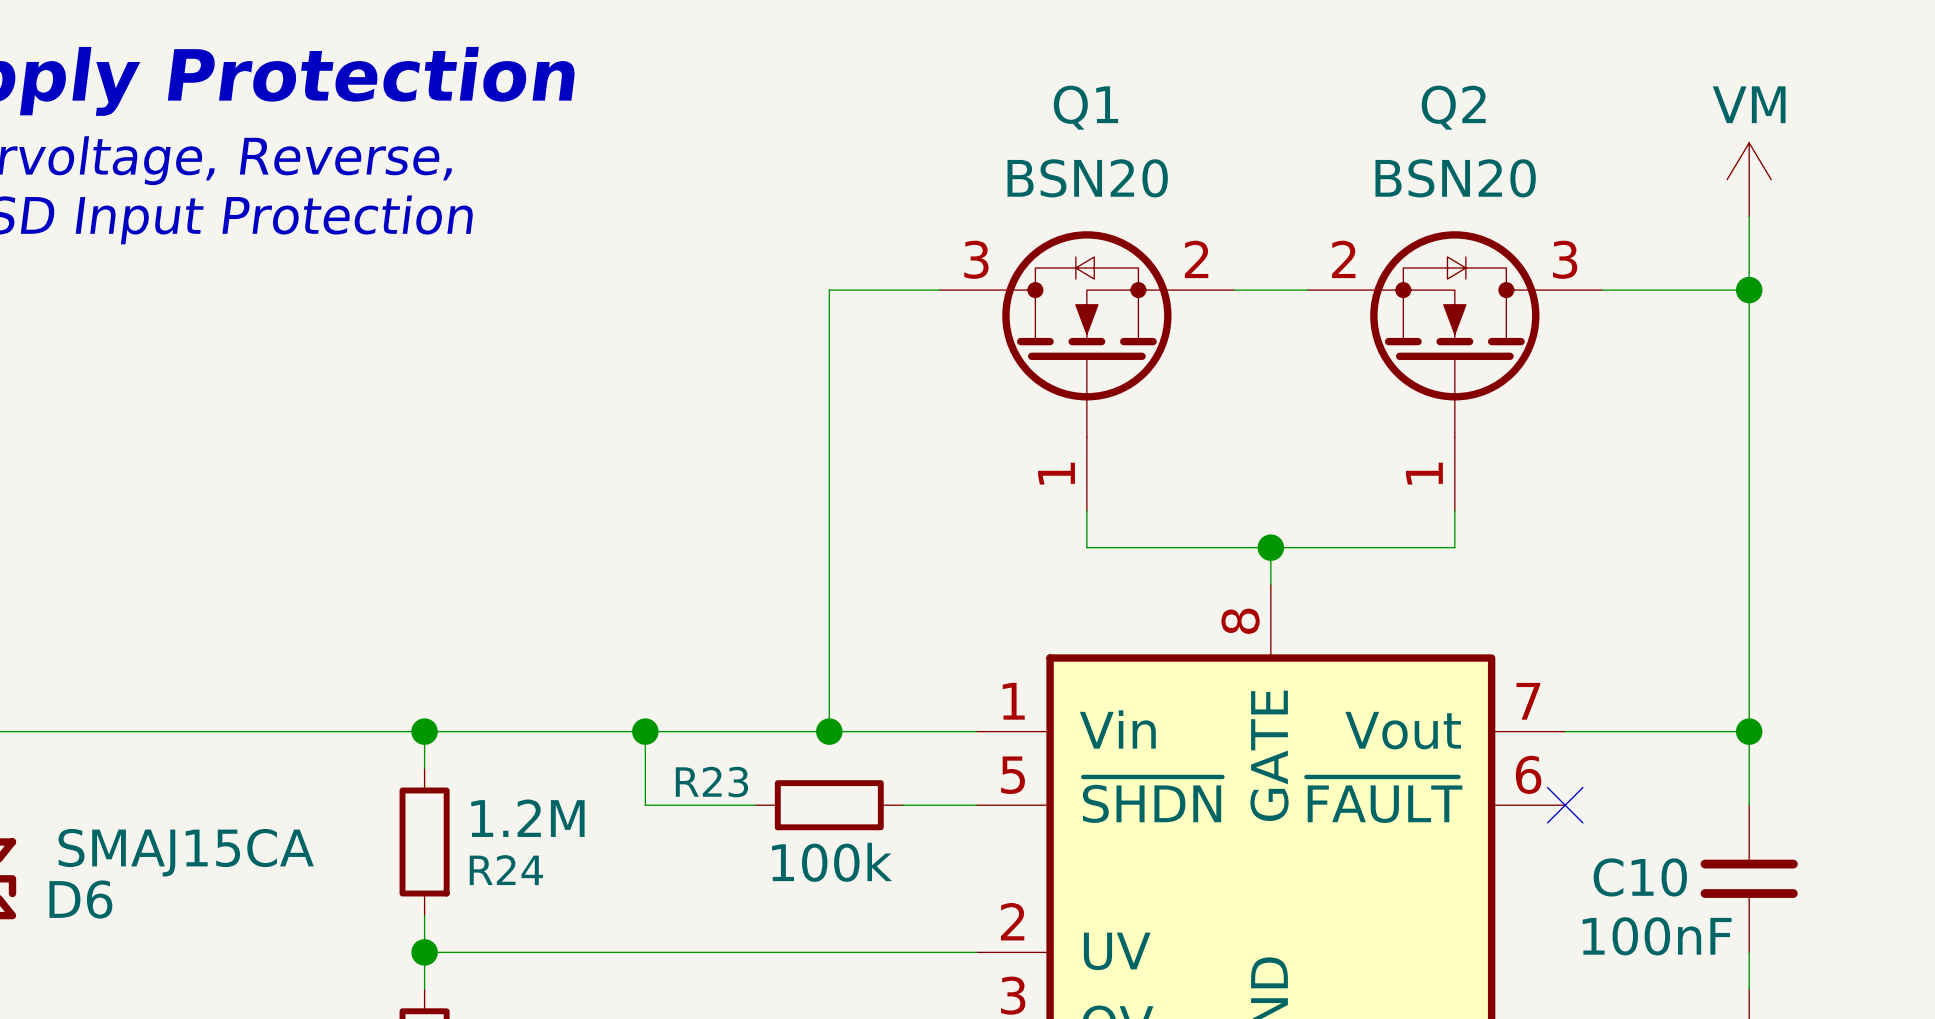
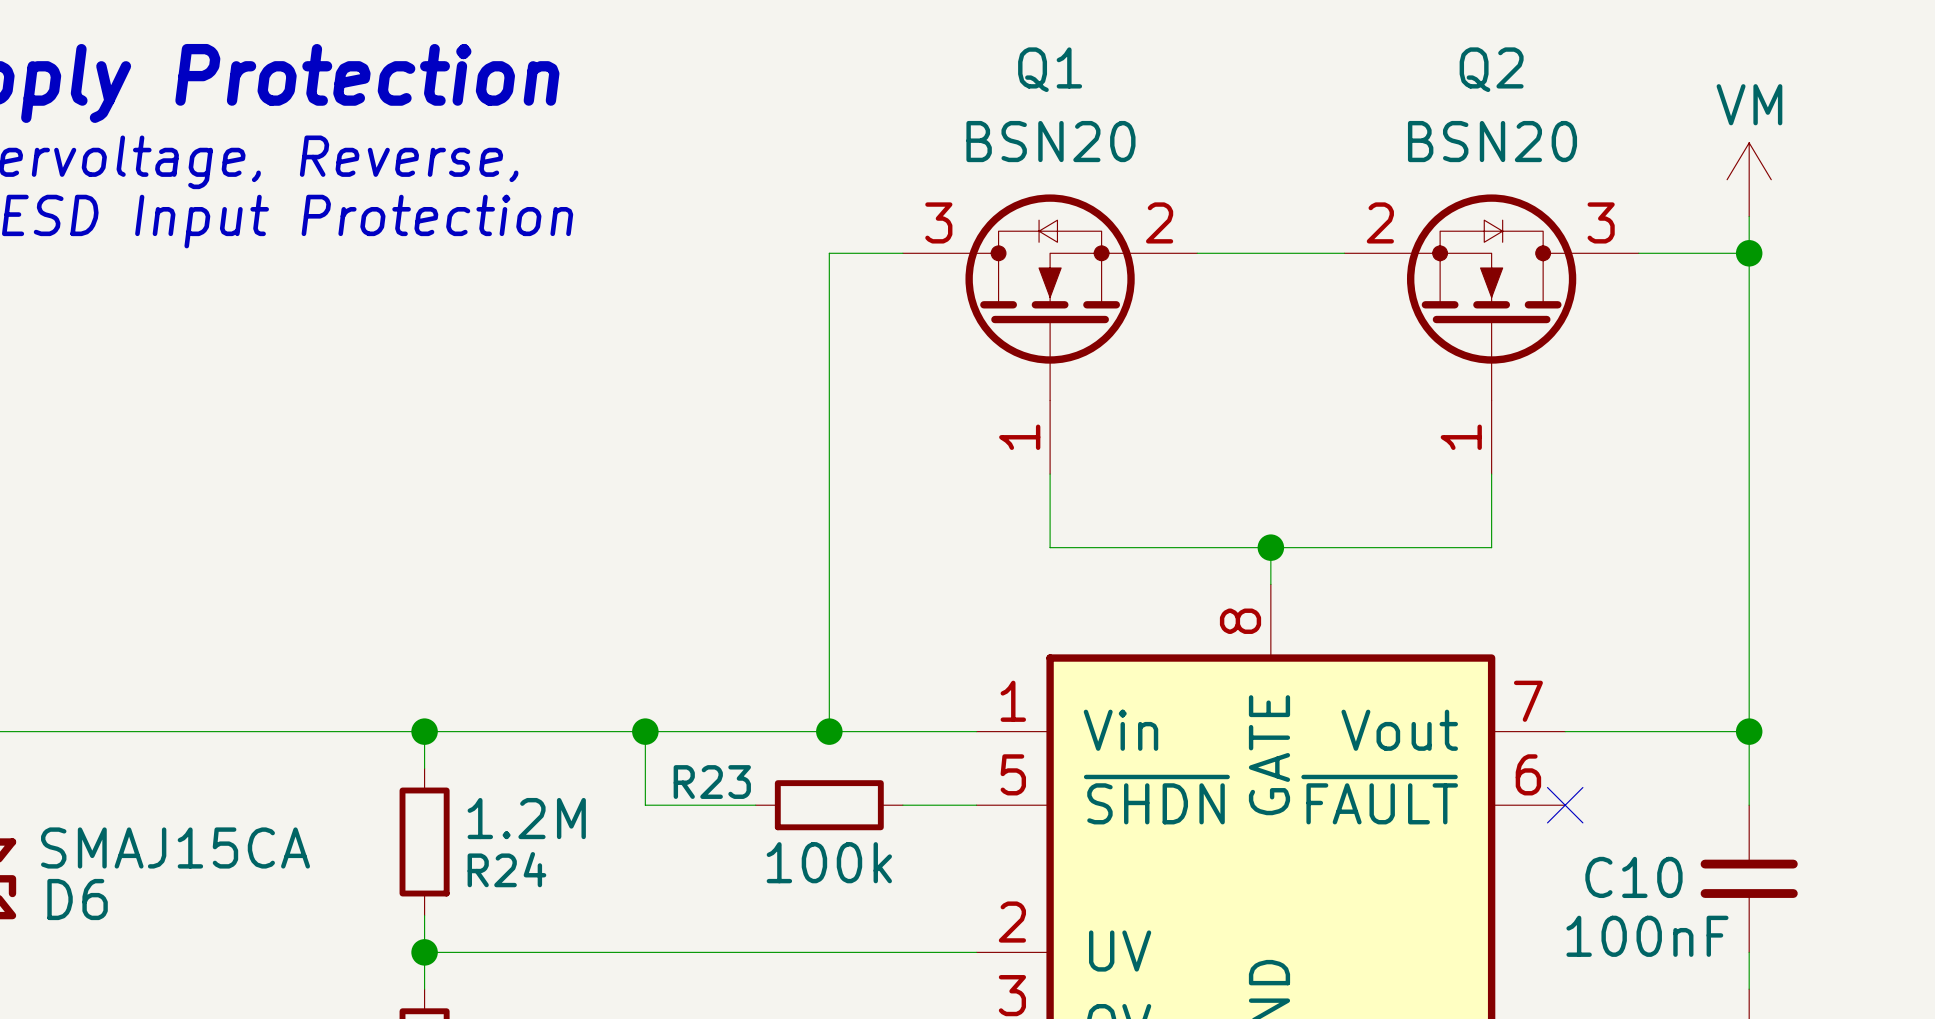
wire: none -> (1638, 253) (1749, 253)
wire: (829, 290) (939, 290) -> (829, 290) (829, 253) (902, 253)
wire: (1234, 290) (1307, 290) -> none
wire: (1602, 290) (1749, 290) -> (1197, 253) (1344, 253)
junction position: (1749, 290) -> (1749, 253)
Q1 position: (1086, 371) -> (1050, 334)
Q2 position: (1454, 371) -> (1491, 334)
wire: (1086, 510) (1086, 547) -> (1050, 474) (1050, 547) (1086, 547)
wire: (1454, 510) (1454, 547) -> (1491, 474) (1491, 547) (1454, 547)

